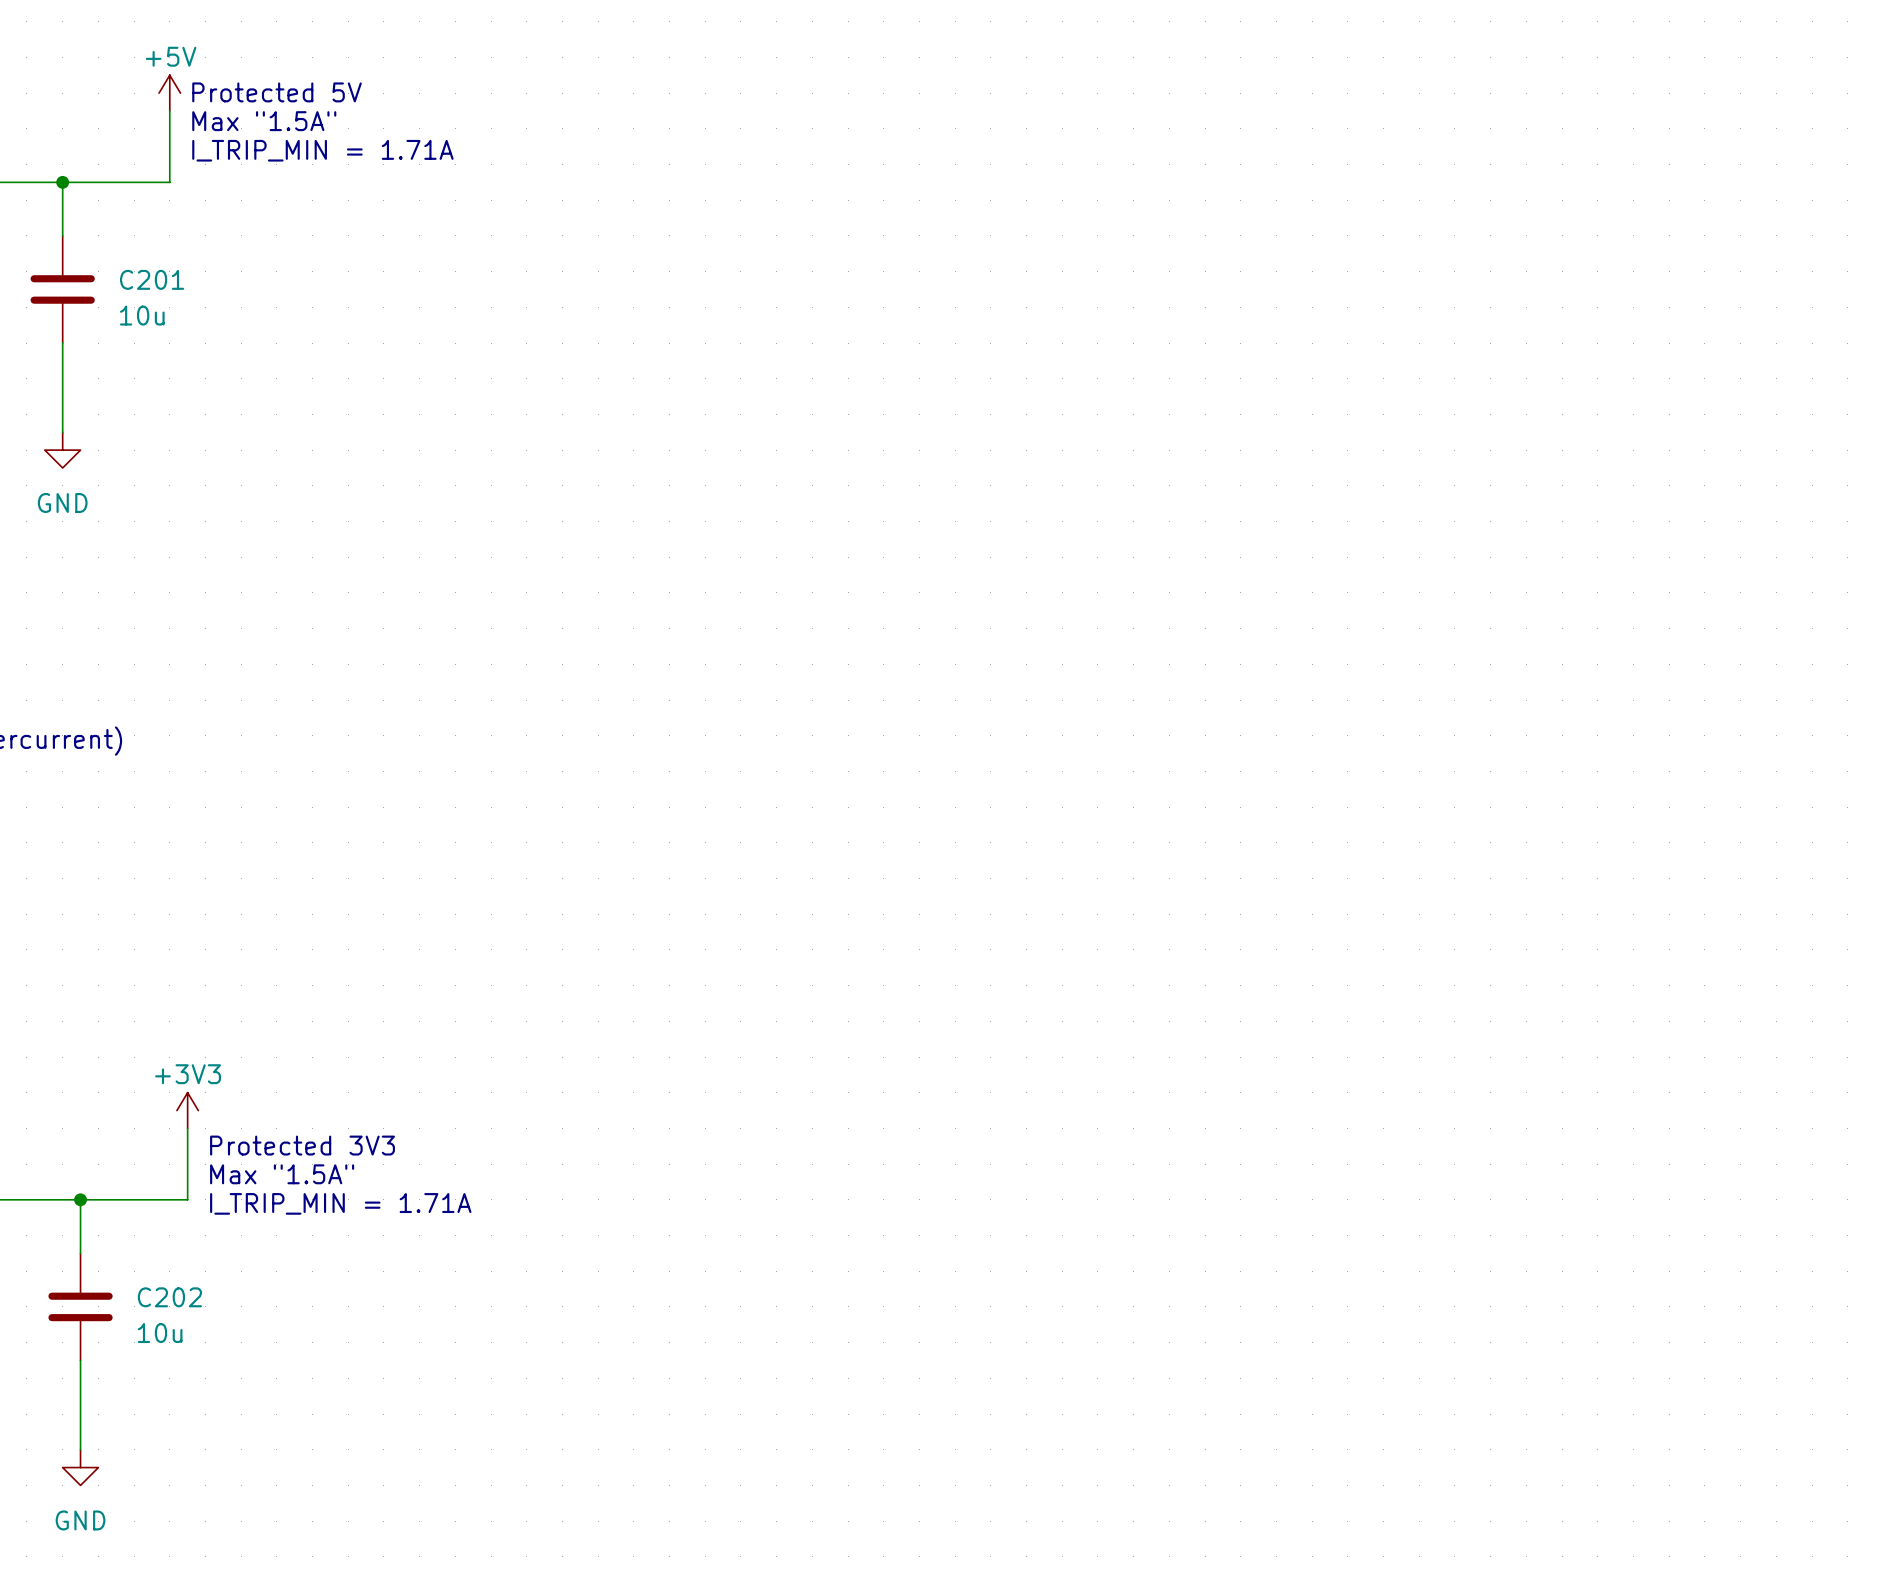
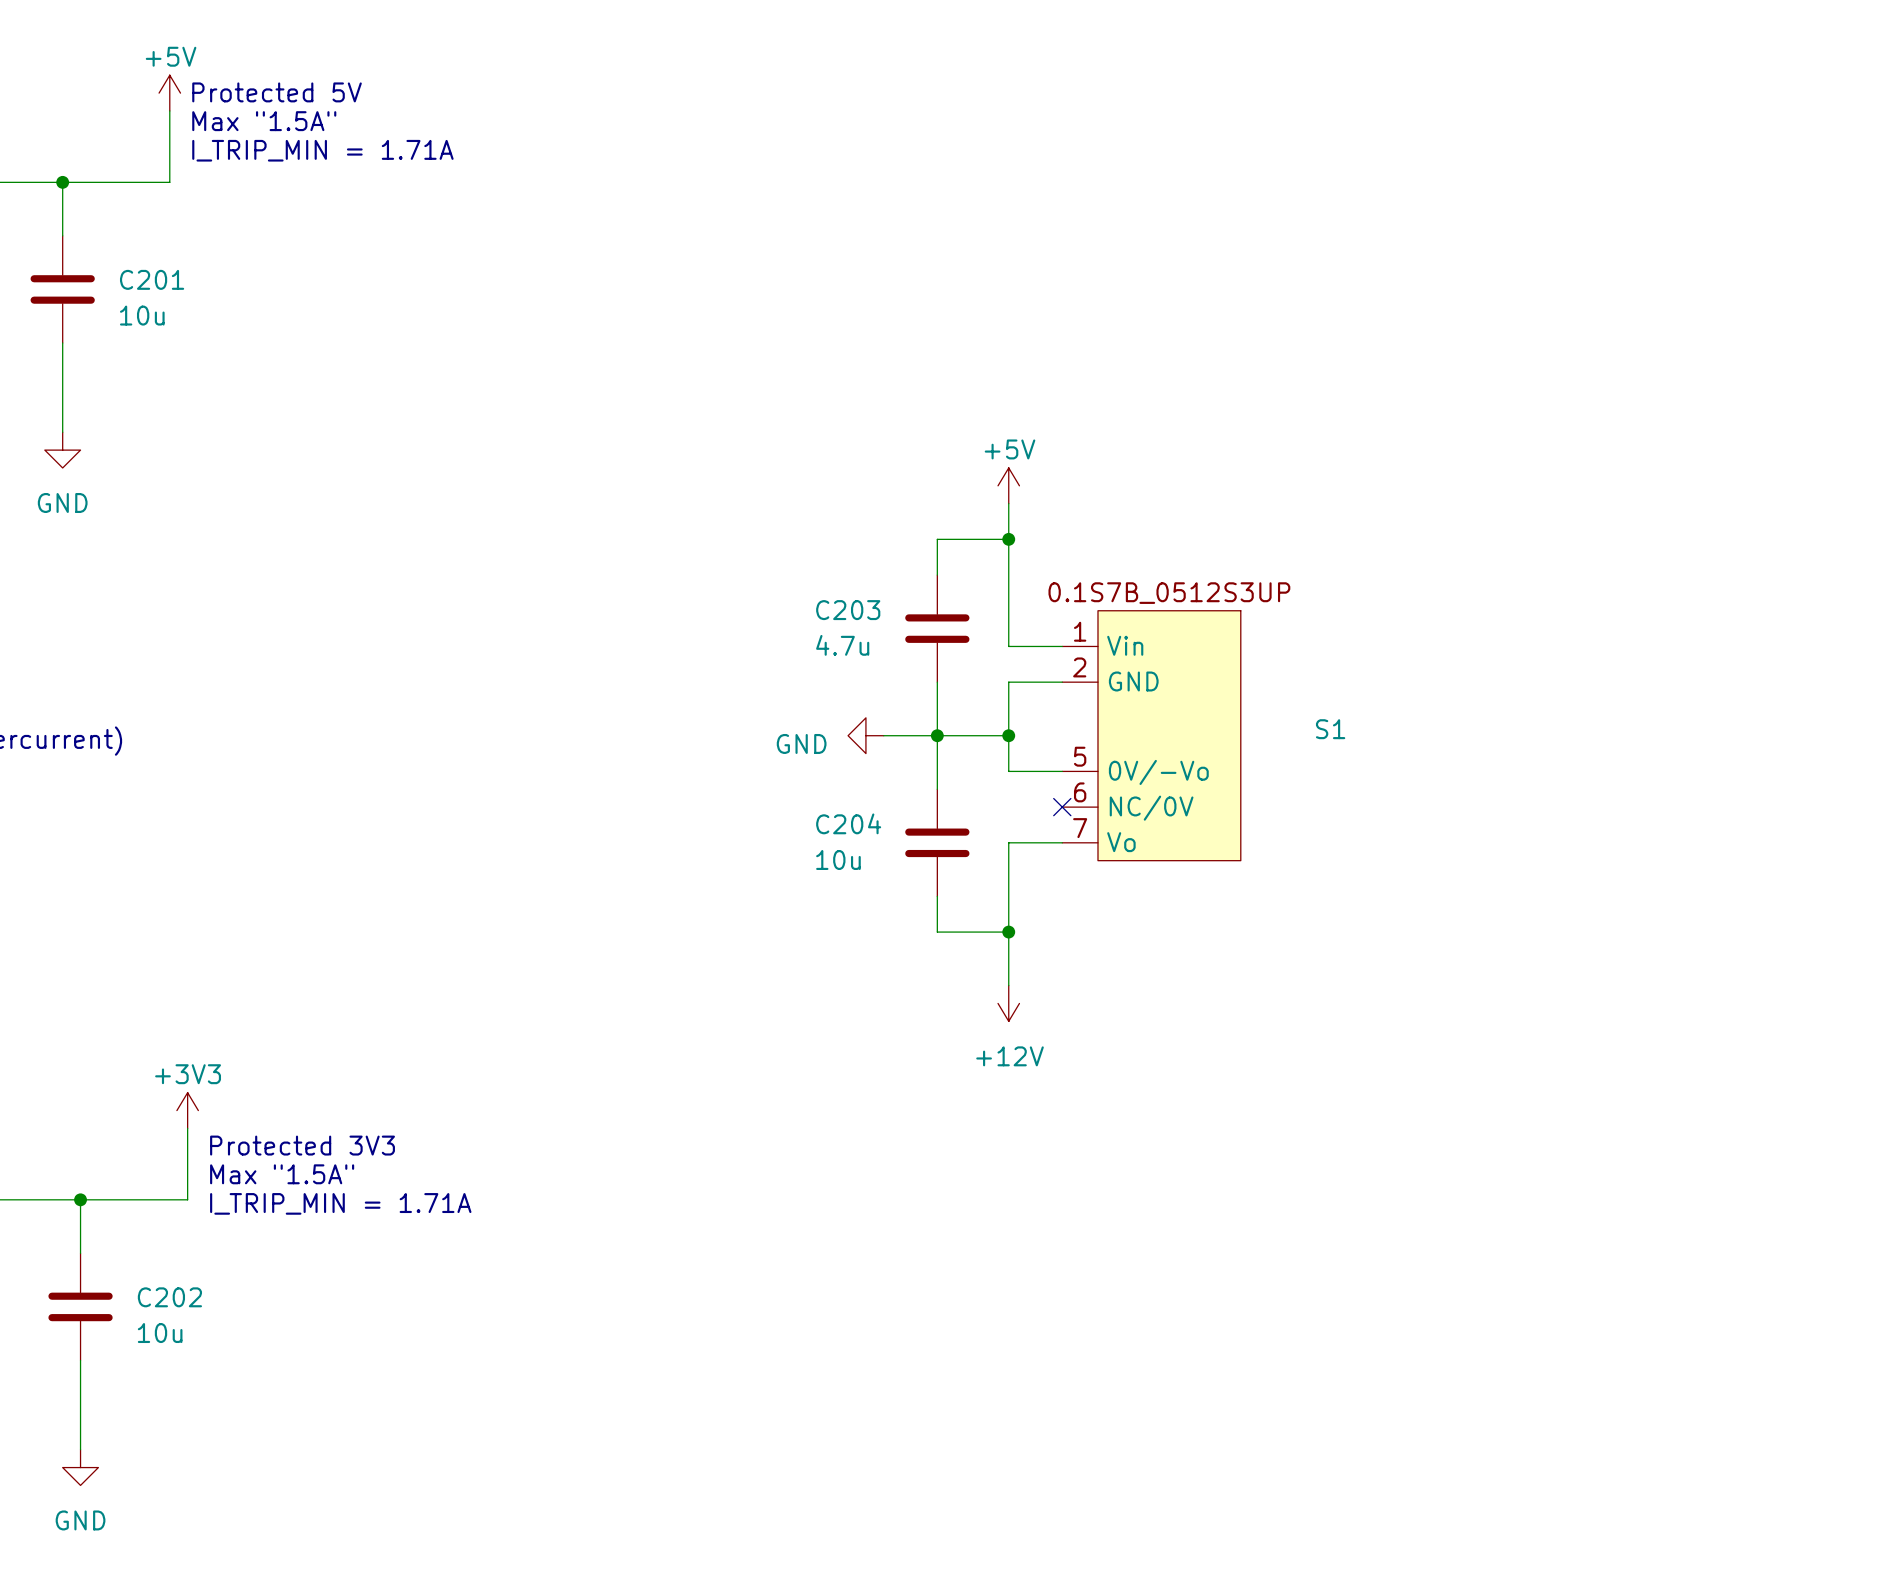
power symbol: none -> +5V (1008, 485)
wire: none -> (1008, 503) (1008, 646) (1062, 646)
wire: none -> (1008, 539) (937, 539) (937, 575)
junction: none -> (1008, 539)
C203: none -> 4.7u (937, 628)
wire: none -> (937, 682) (937, 789)
wire: none -> (1062, 682) (1008, 682) (1008, 771) (1062, 771)
power symbol: none -> GND (865, 735)
wire: none -> (883, 735) (1008, 735)
junction: none -> (937, 735)
junction: none -> (1008, 735)
S1: none -> (1151, 735)
no-connect mark: none -> (1062, 807)
C204: none -> 10u (937, 842)
wire: none -> (1062, 842) (1008, 842) (1008, 985)
wire: none -> (937, 896) (937, 932) (1008, 932)
junction: none -> (1008, 932)
power symbol: none -> +12V (1008, 1003)

